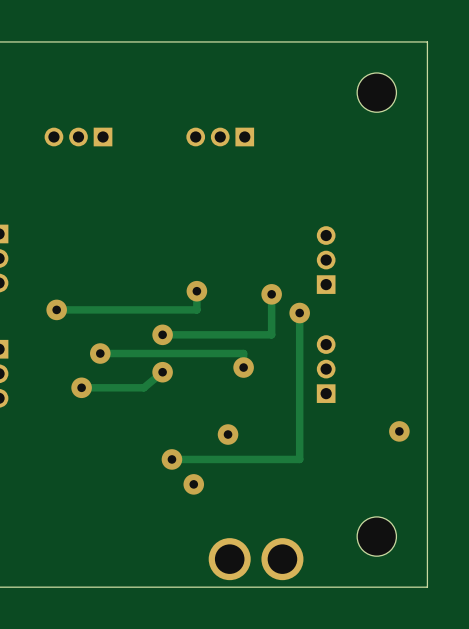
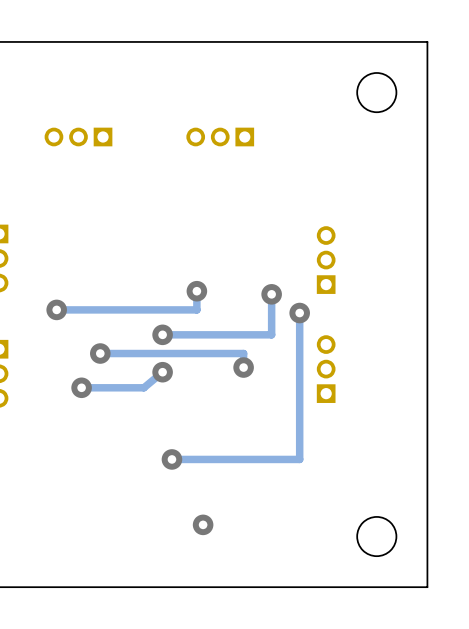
via: (399, 431) -> none
via: (228, 434) -> none
via position: (193, 484) -> (203, 524)
part: (256, 559) -> none

